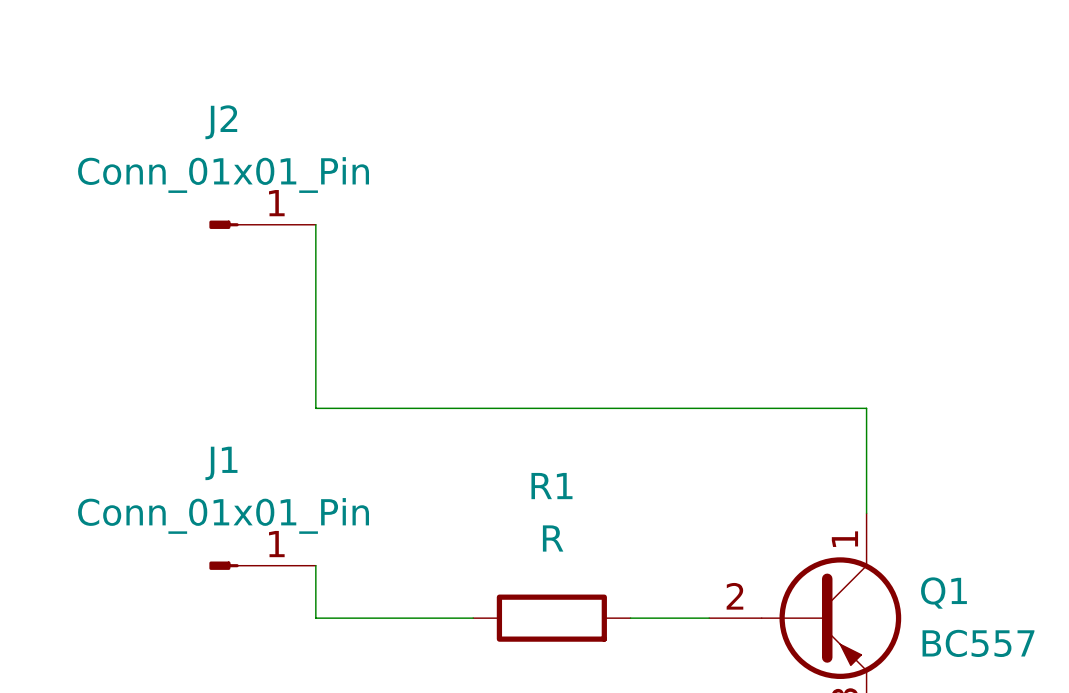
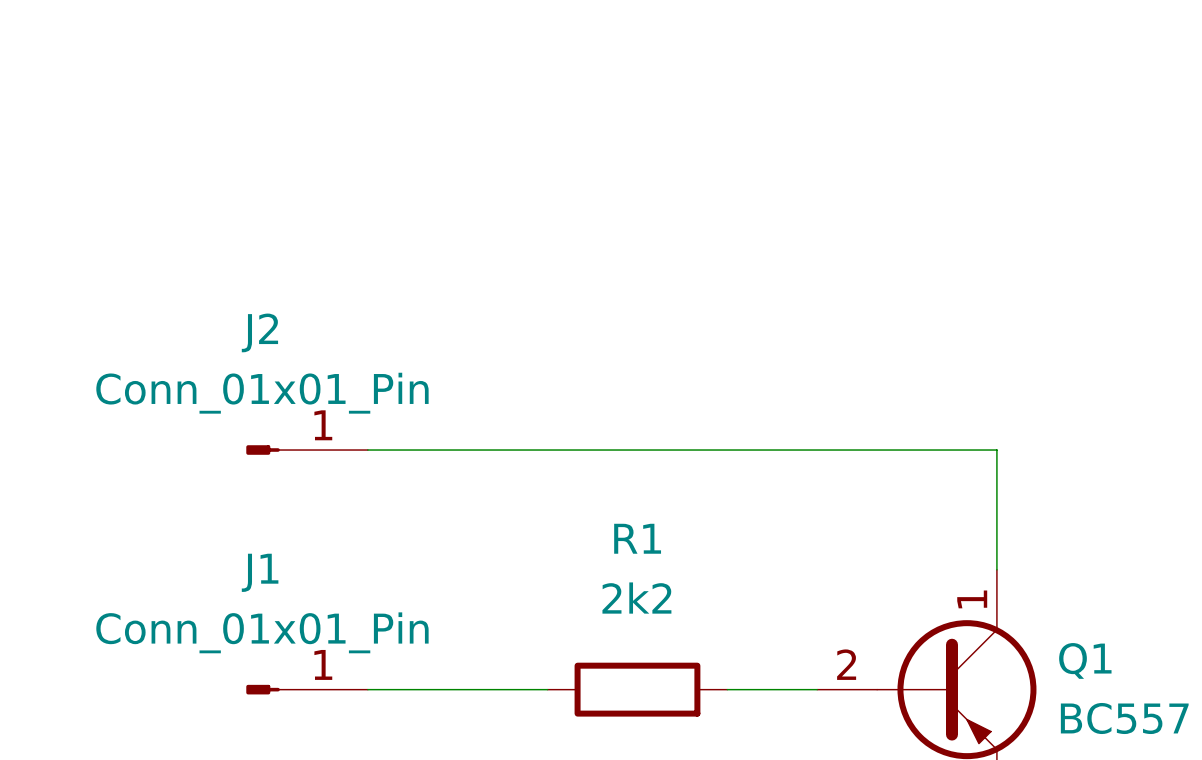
J2 position: (262, 224) -> (307, 450)
wire: (315, 224) (315, 408) -> none
R1 value: R (553, 538) -> 2k2 (636, 598)
J1 position: (262, 565) -> (307, 689)
wire: (315, 565) (315, 618) -> none

